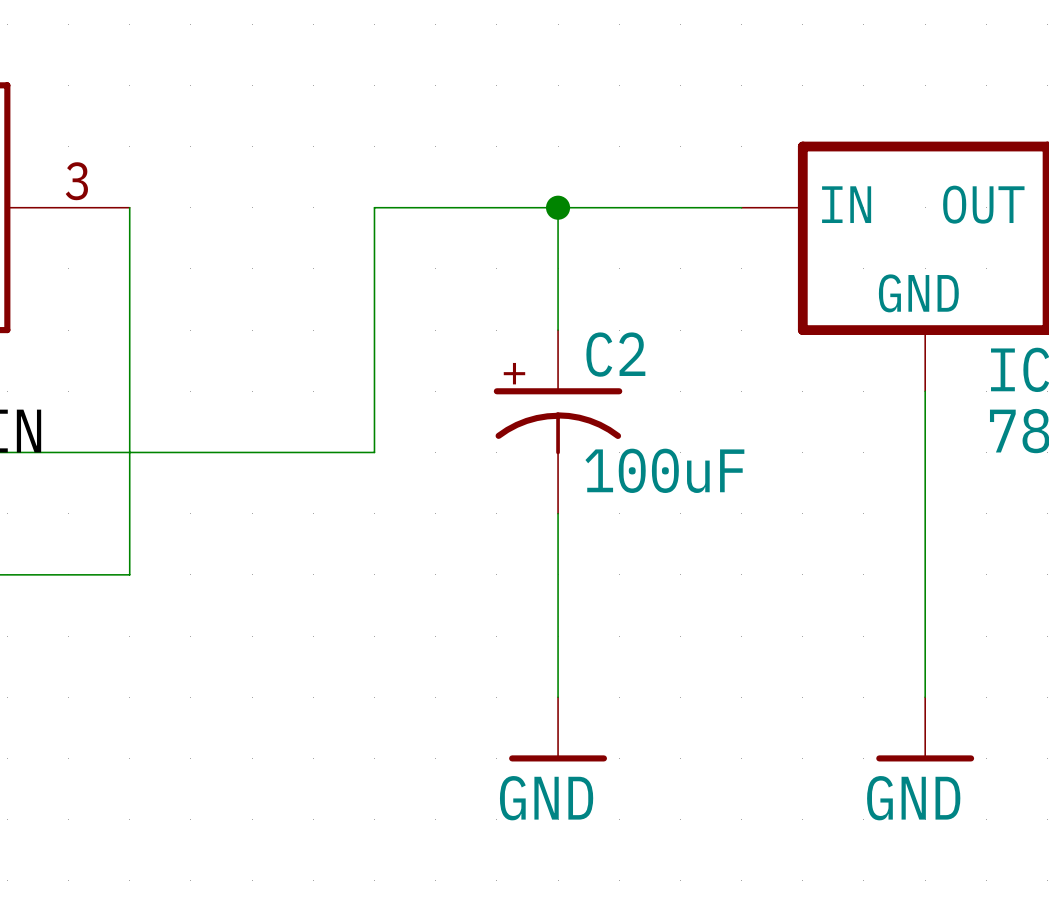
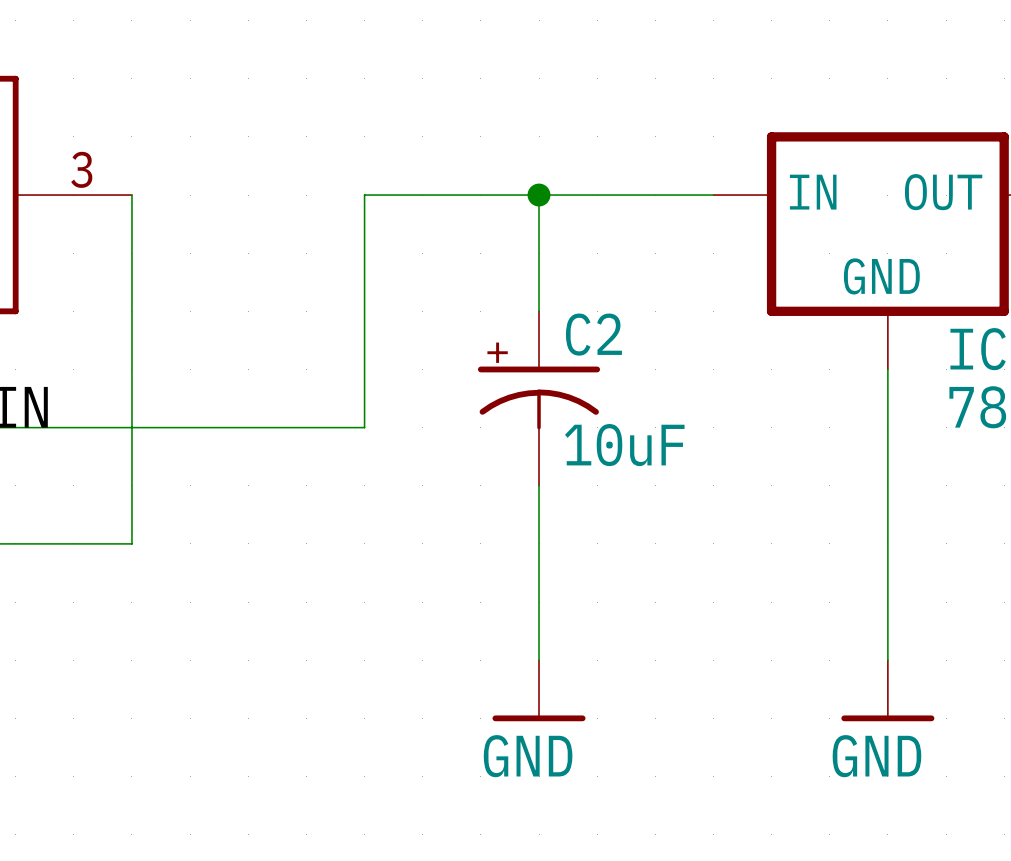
C2 value: 100uF (664, 470) -> 10uF (624, 445)

